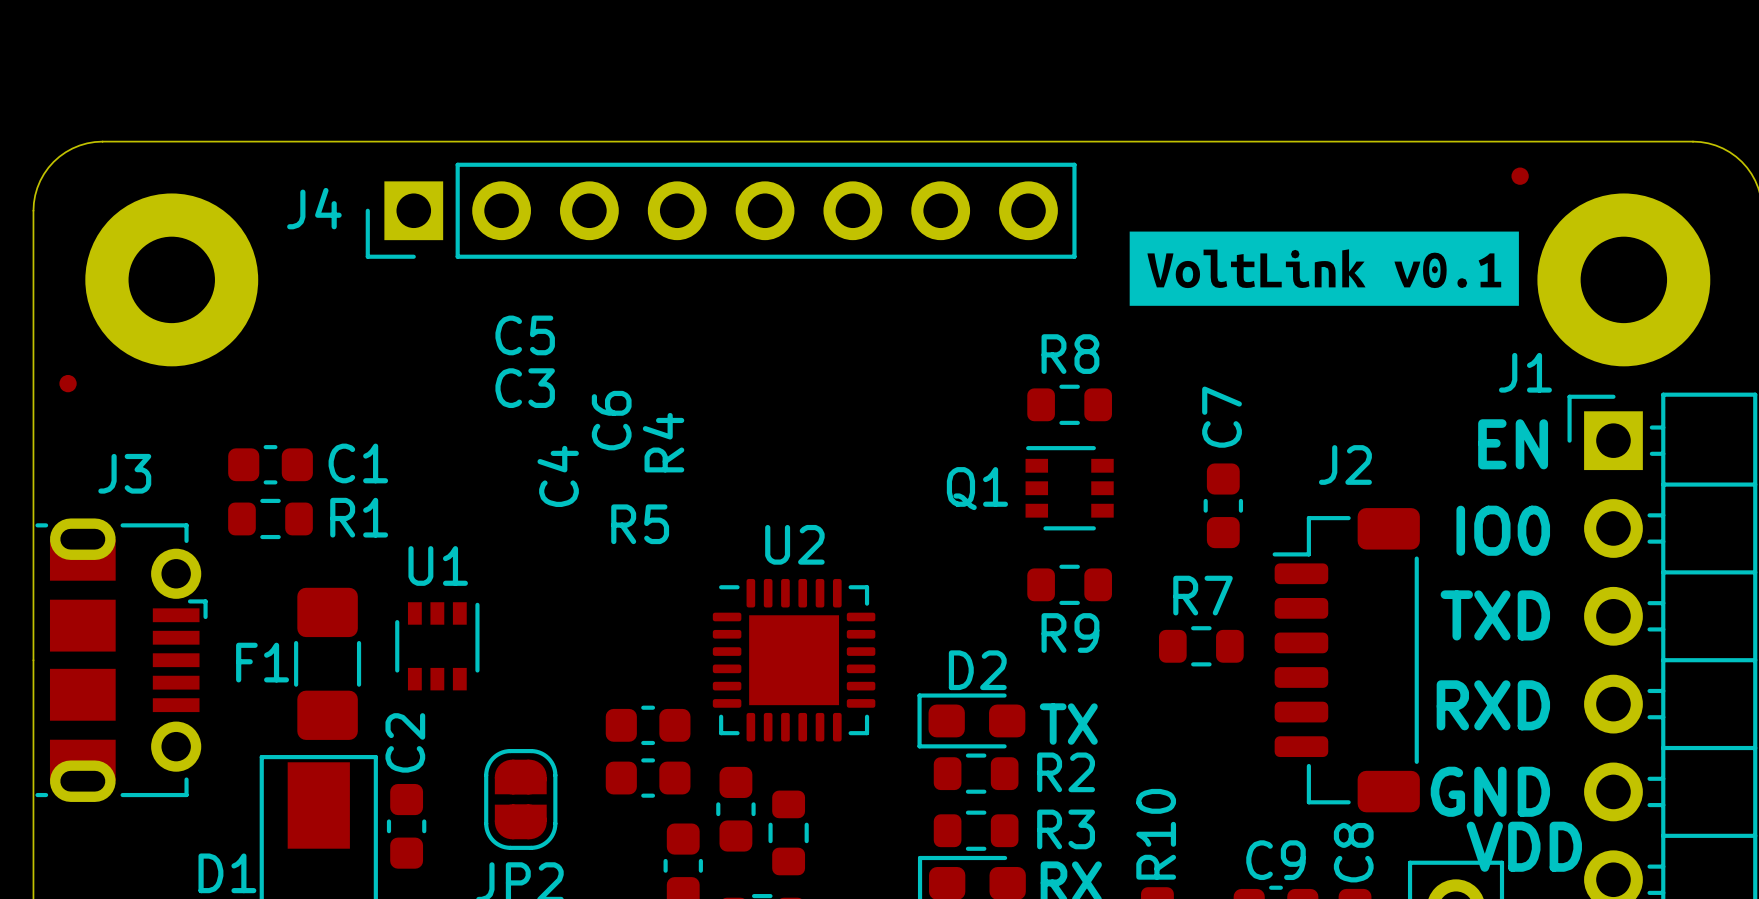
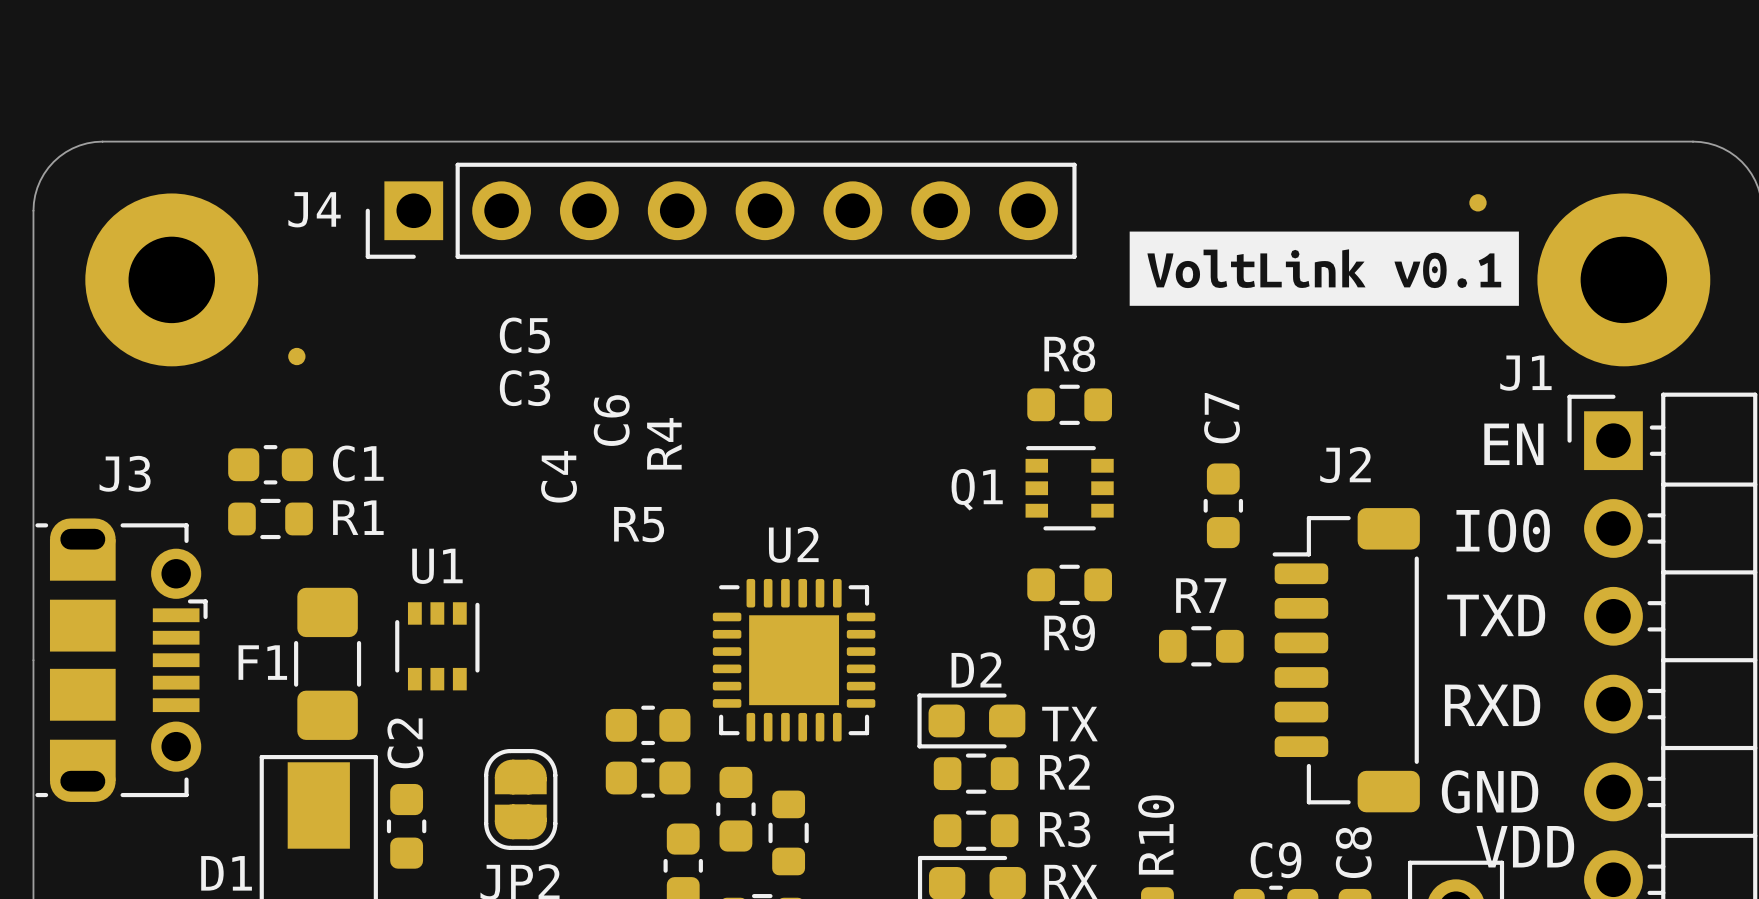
part position: (1520, 176) -> (1477, 202)
part position: (68, 383) -> (296, 356)

